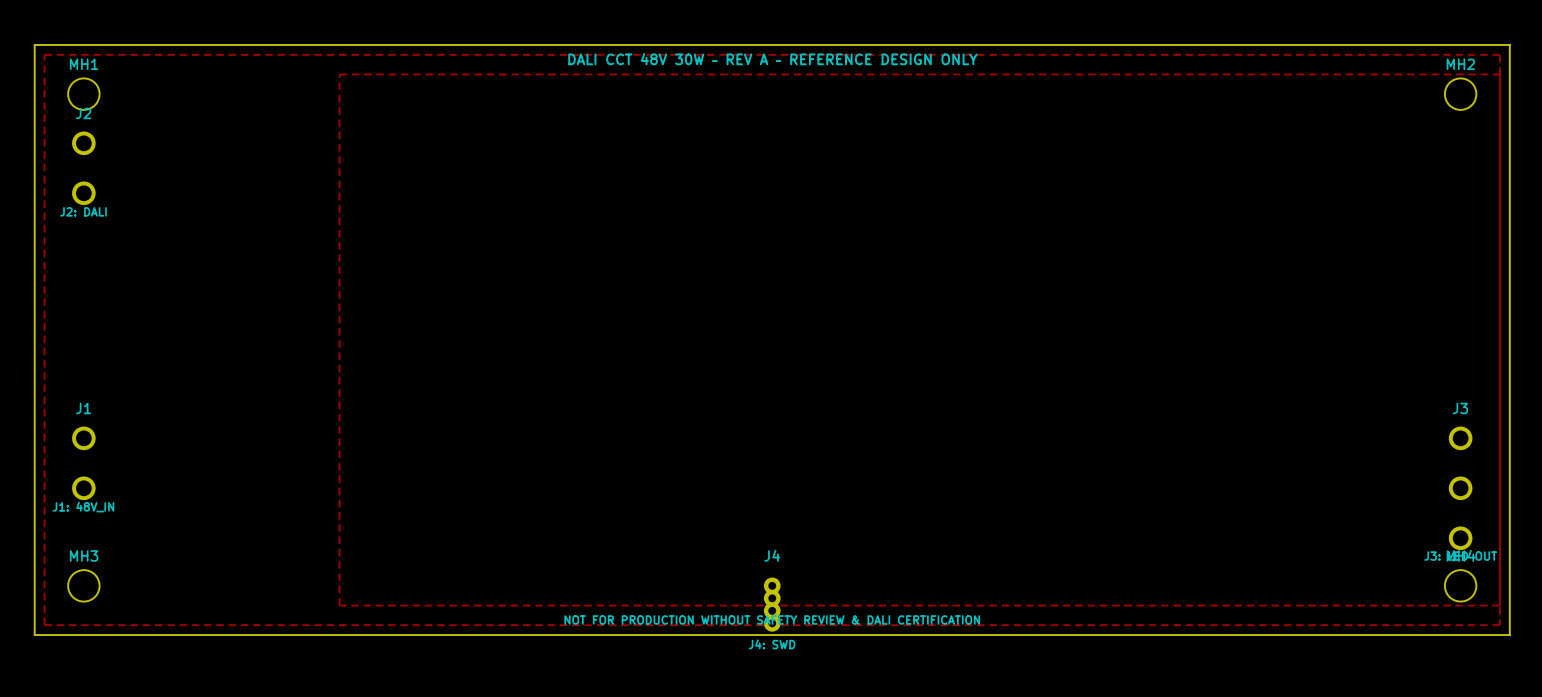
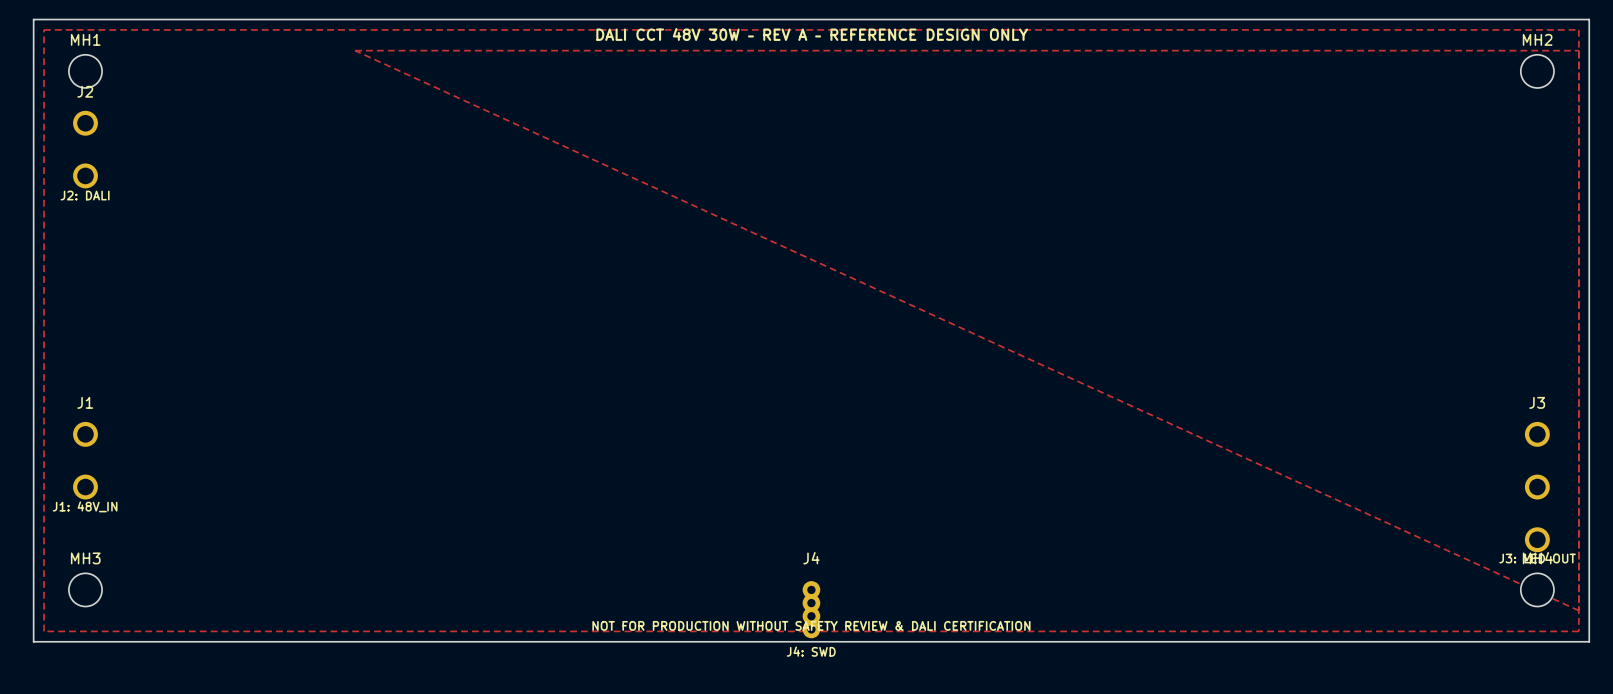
zone outline: (339, 74) (339, 605) (1499, 605) -> (355, 50) (1578, 610)

